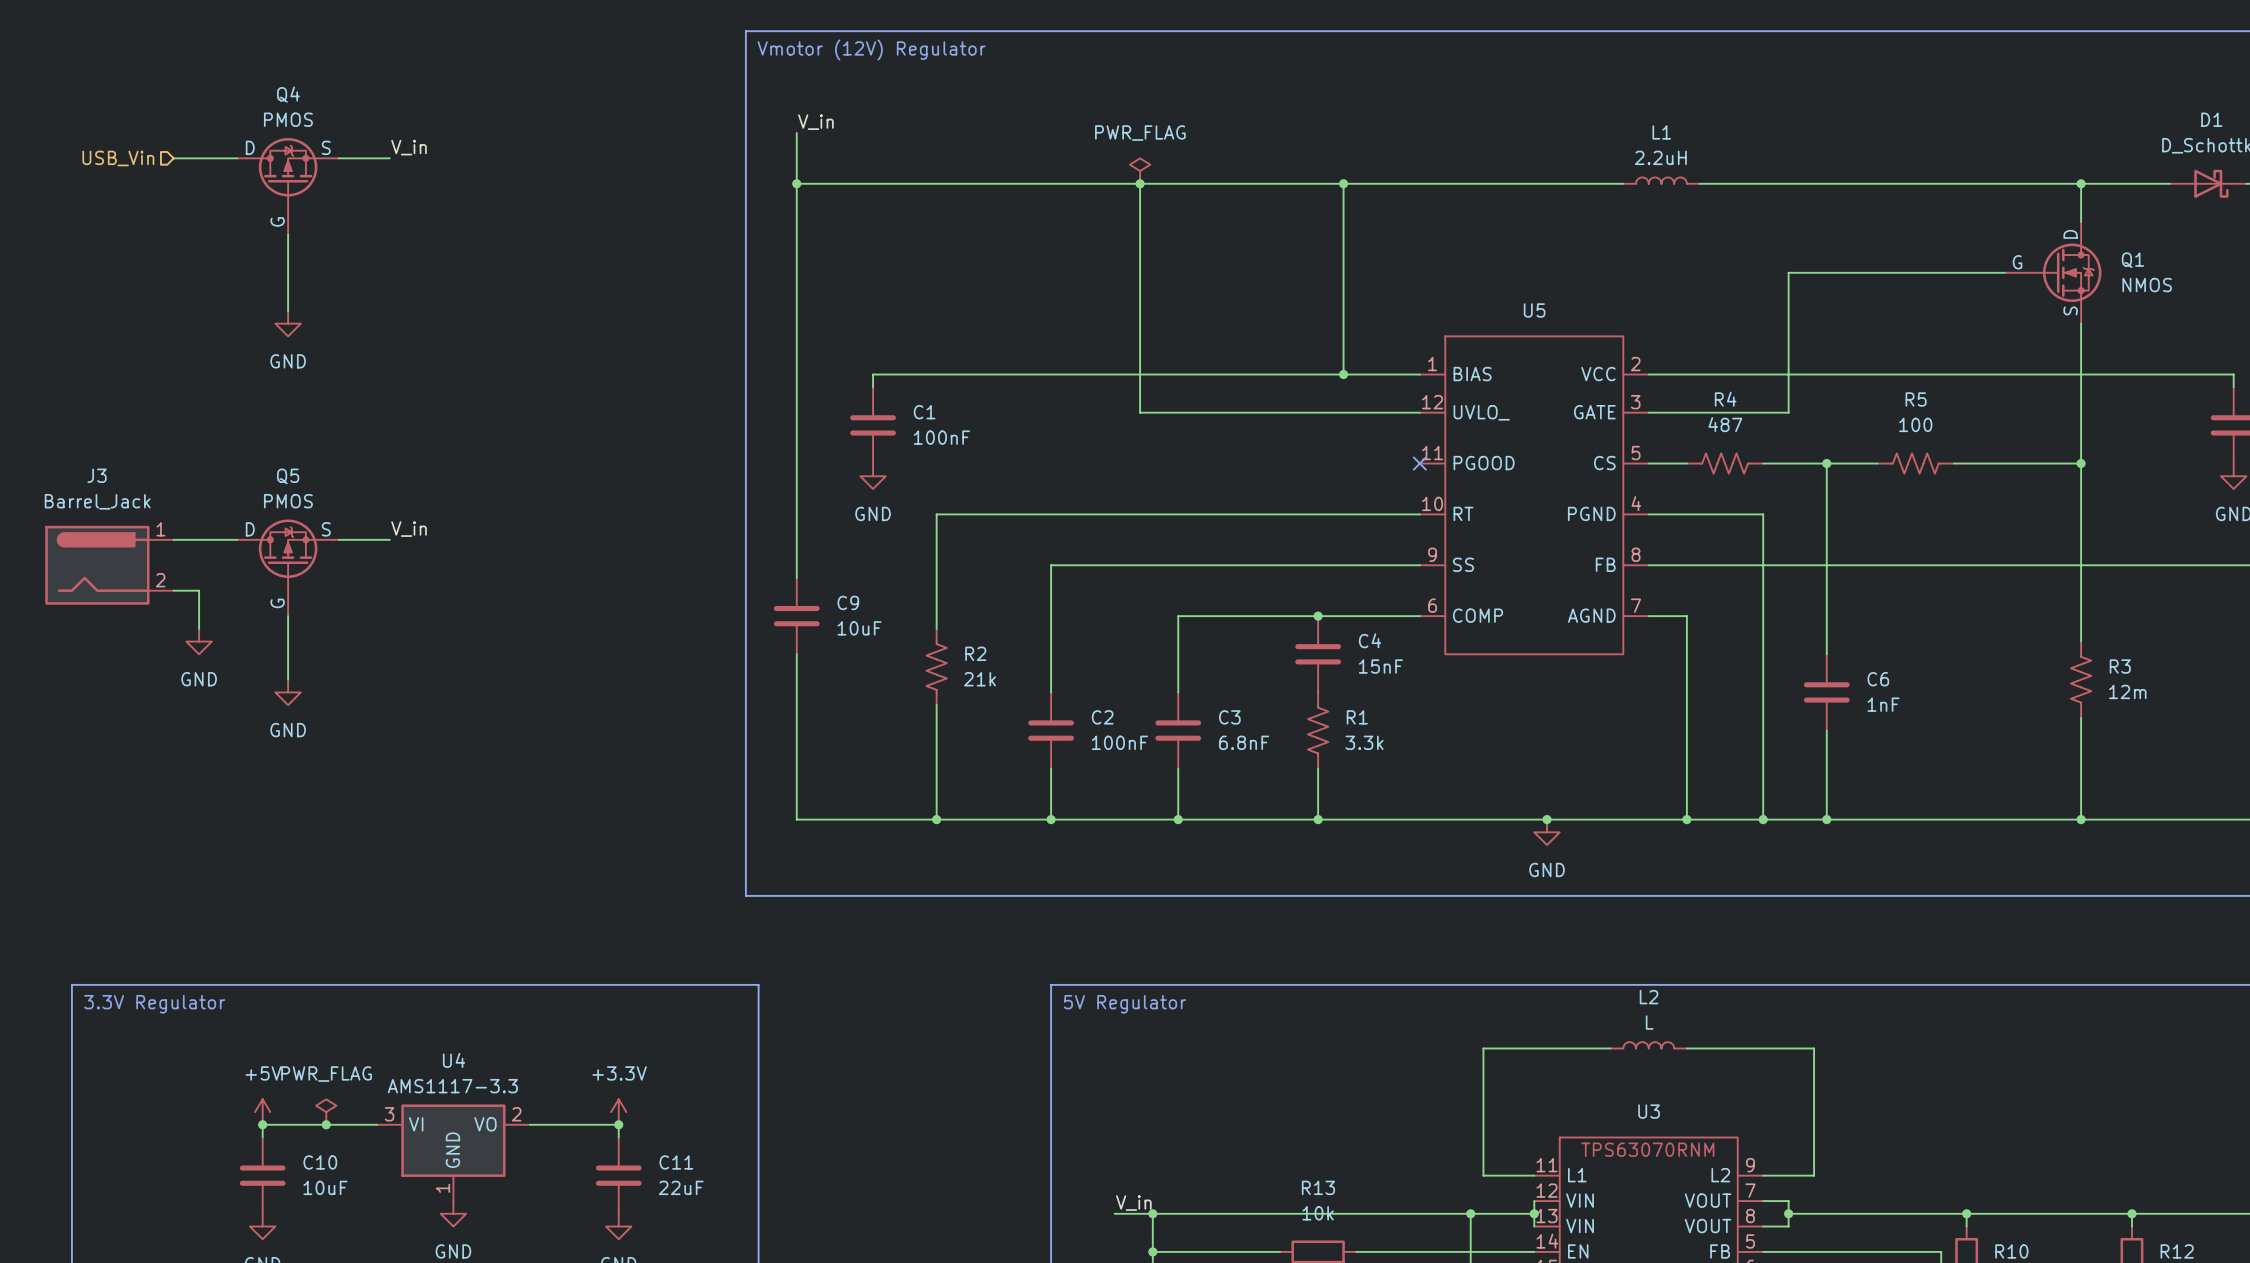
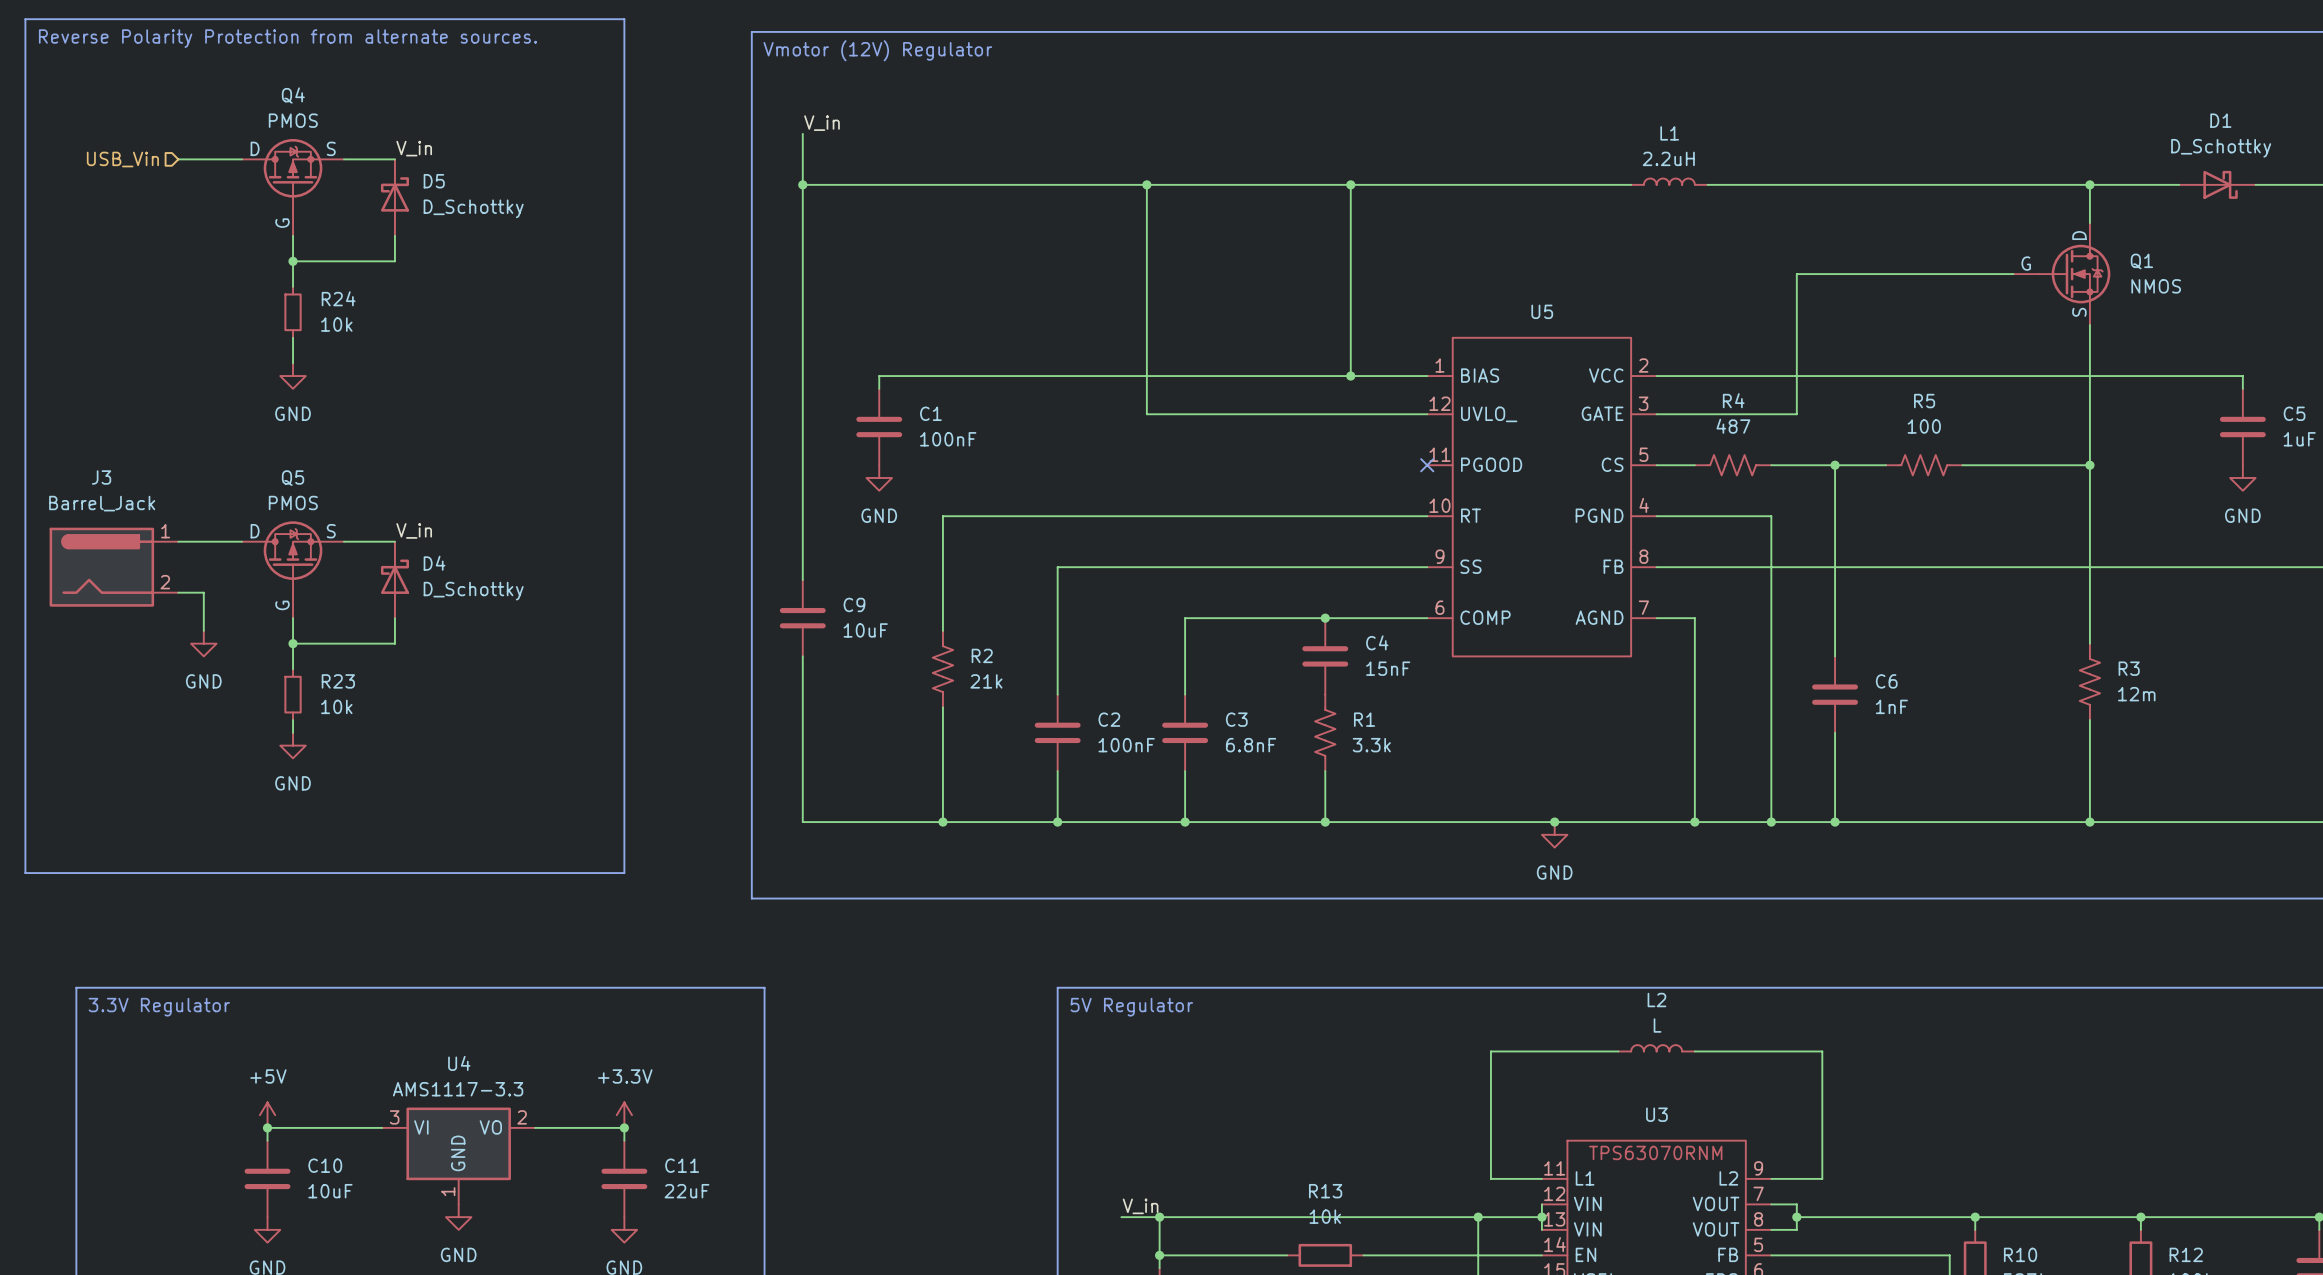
line: none -> (25, 19) (624, 19) (624, 873) (25, 873) (25, 19)
text: none -> Reverse Polarity Protection from alternate sources. (287, 38)
power symbol: PWR_FLAG (1140, 171) -> none
D5: none -> D_Schottky (394, 197)
wire: none -> (394, 235) (394, 261) (293, 261)
junction: none -> (293, 261)
wire: (288, 285) (288, 310) -> (293, 337) (293, 363)
R24: none -> 10k (293, 312)
power symbol position: GND (288, 323) -> GND (293, 376)
D4: none -> D_Schottky (394, 579)
wire: none -> (394, 618) (394, 643) (293, 643)
junction: none -> (293, 643)
power symbol position: GND (288, 692) -> GND (293, 745)
R23: none -> 10k (293, 694)
power symbol: PWR_FLAG (326, 1112) -> none
junction: (326, 1124) -> none

